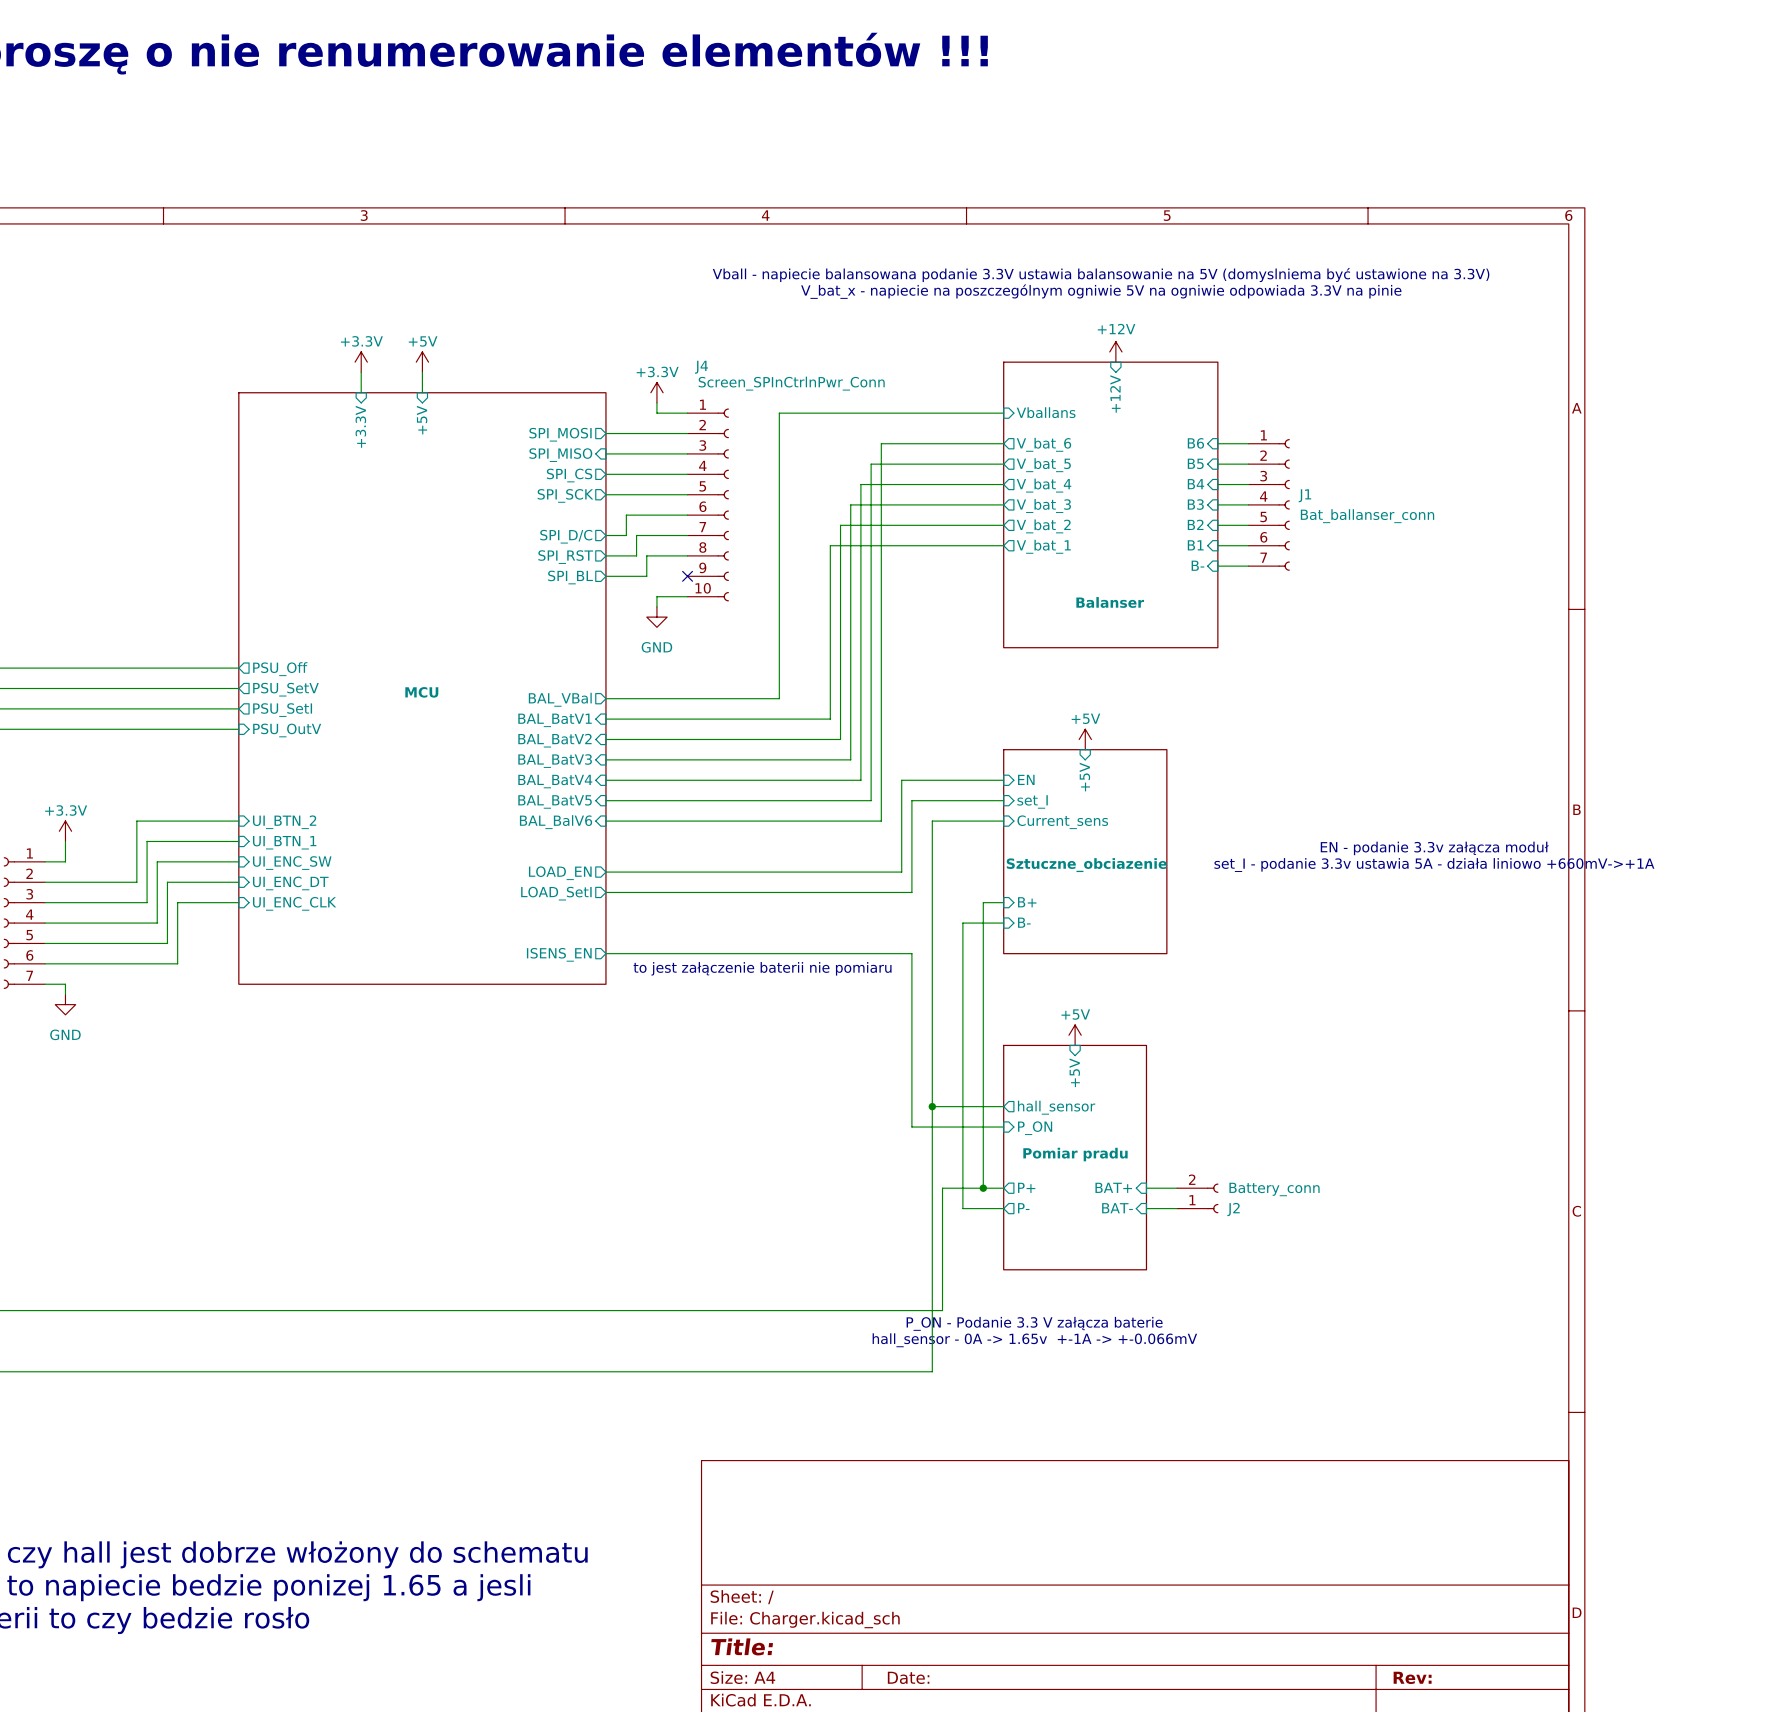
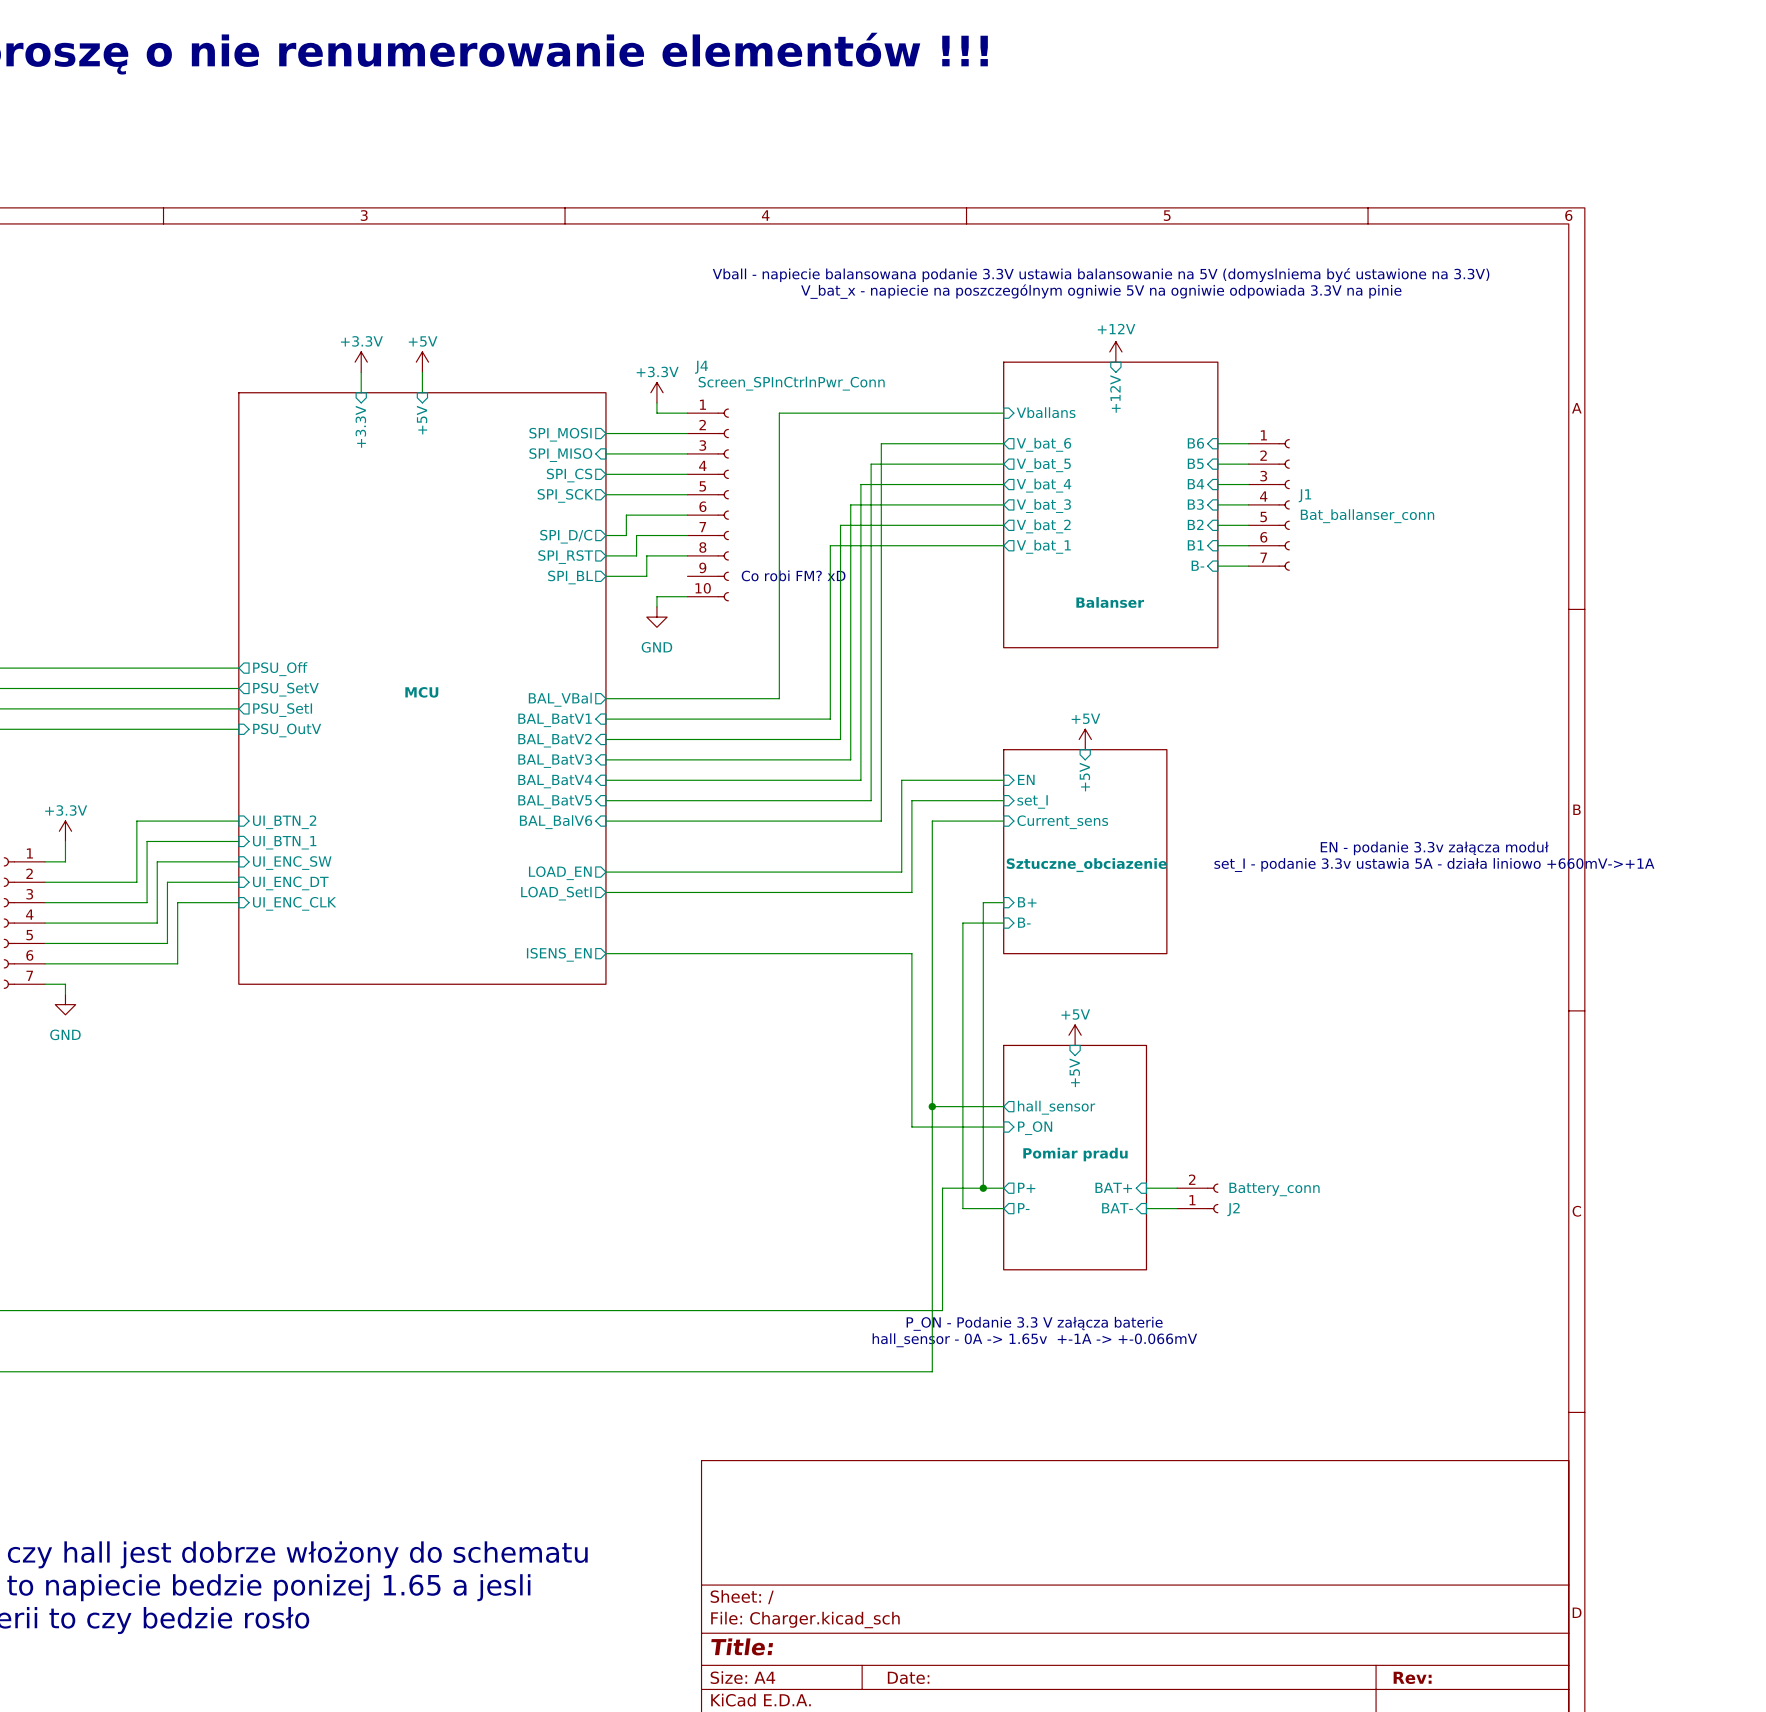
text: none -> Co robi FM? xD (793, 575)
no-connect mark: (687, 576) -> none
text: to jest załączenie baterii nie pomiaru (762, 968) -> none

